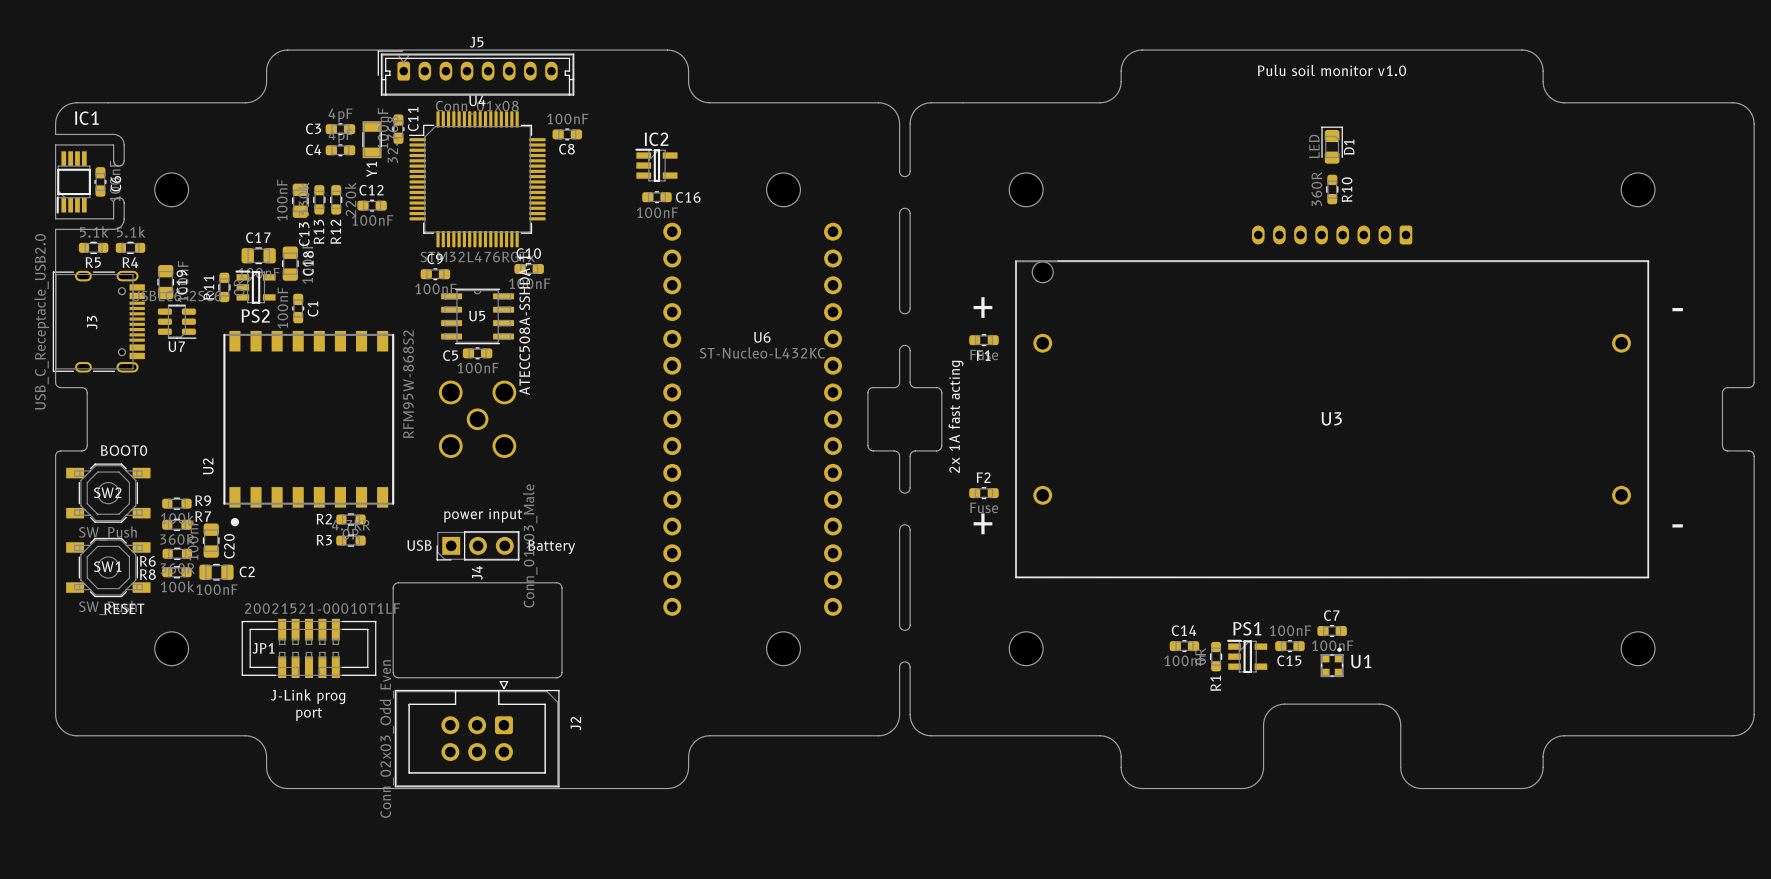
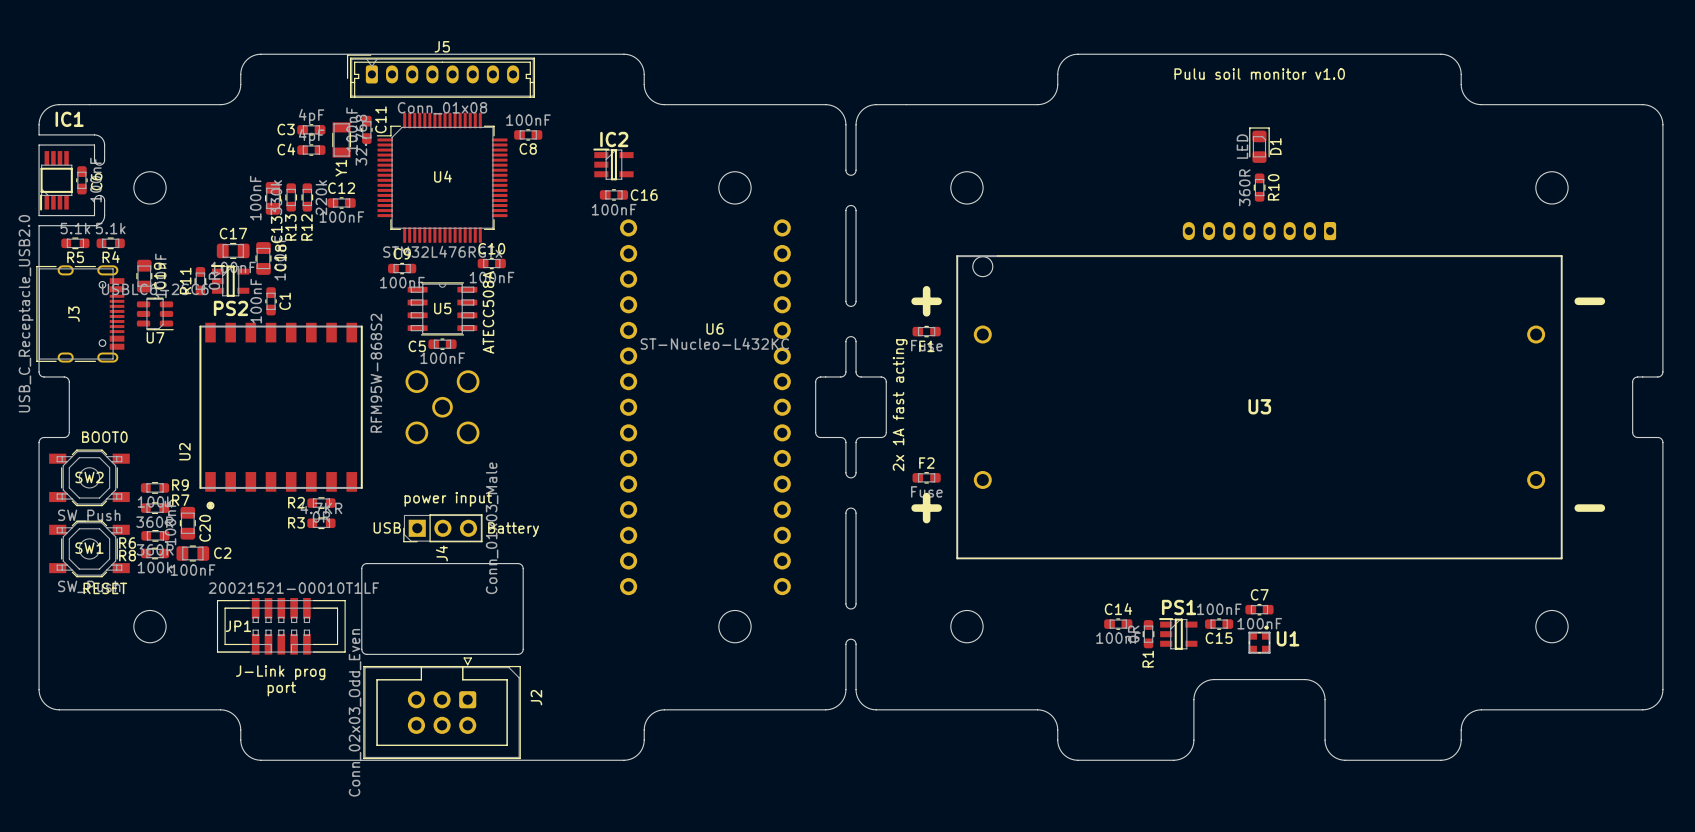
U4 name position: U4 (477, 100) -> U4 (442, 176)
U5 value: ATECC508A-SSHDA-T (524, 324) -> ATECC508A (488, 312)

